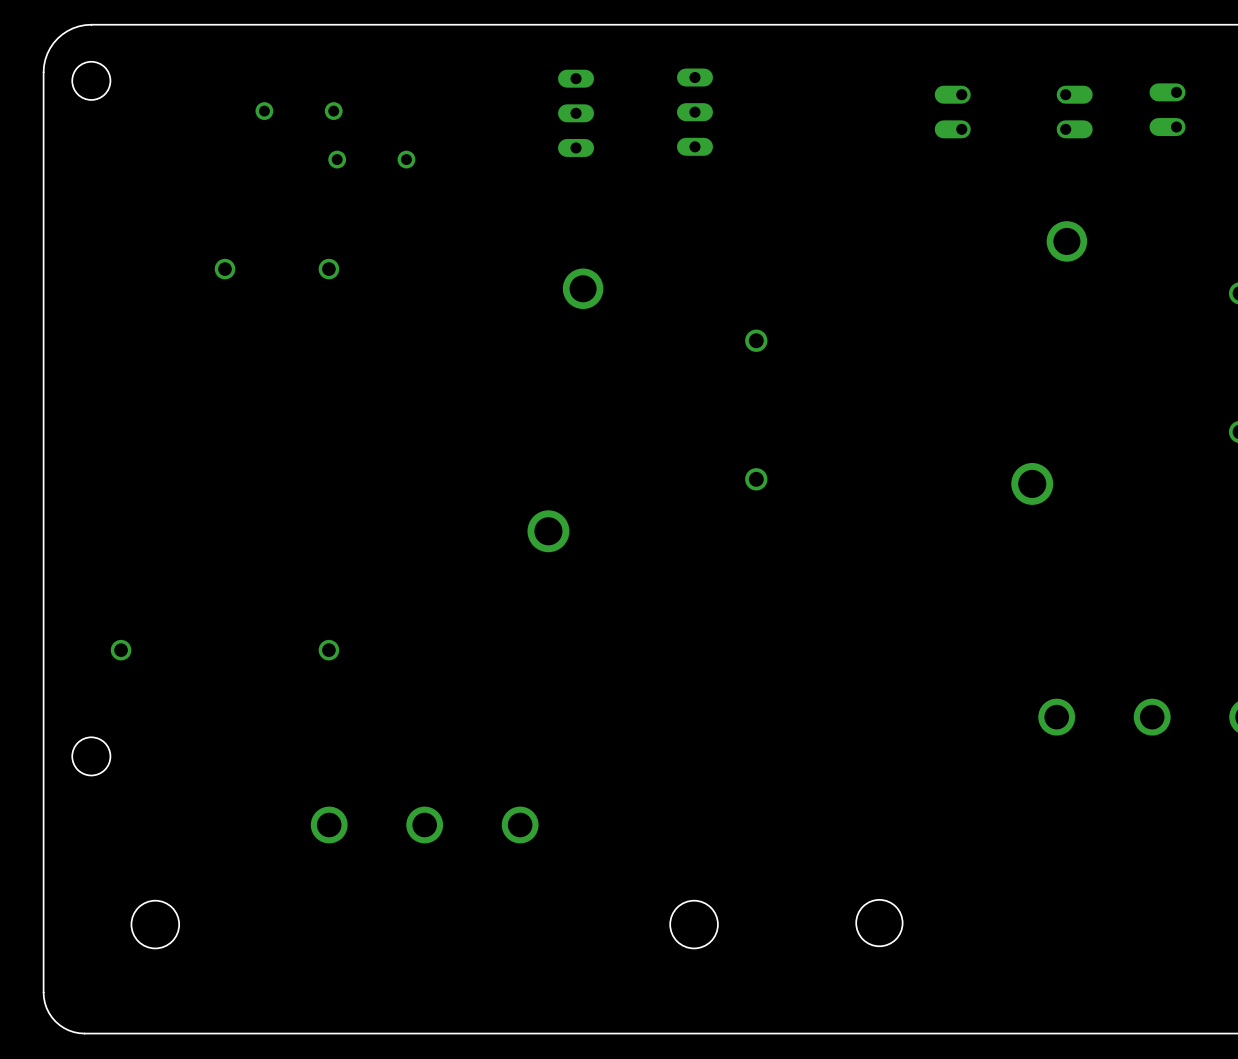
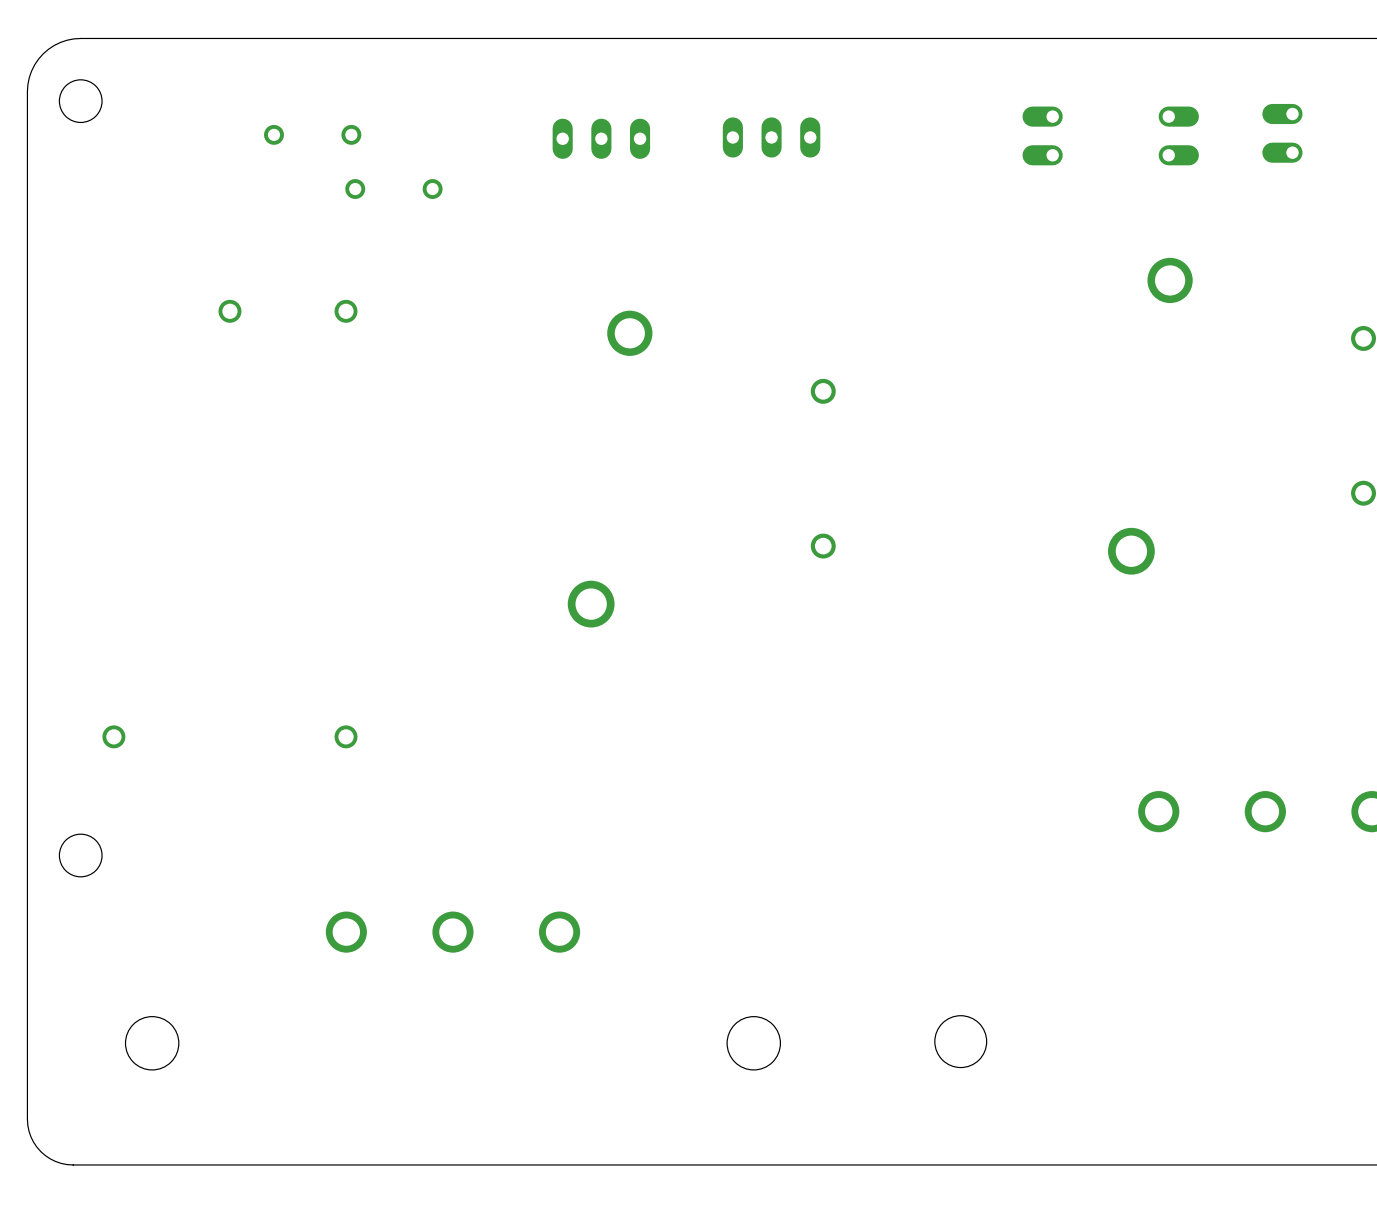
part rotation: 0° (694, 112) -> 90° clockwise (771, 137)
part rotation: 0° (576, 113) -> 90° clockwise (601, 138)

